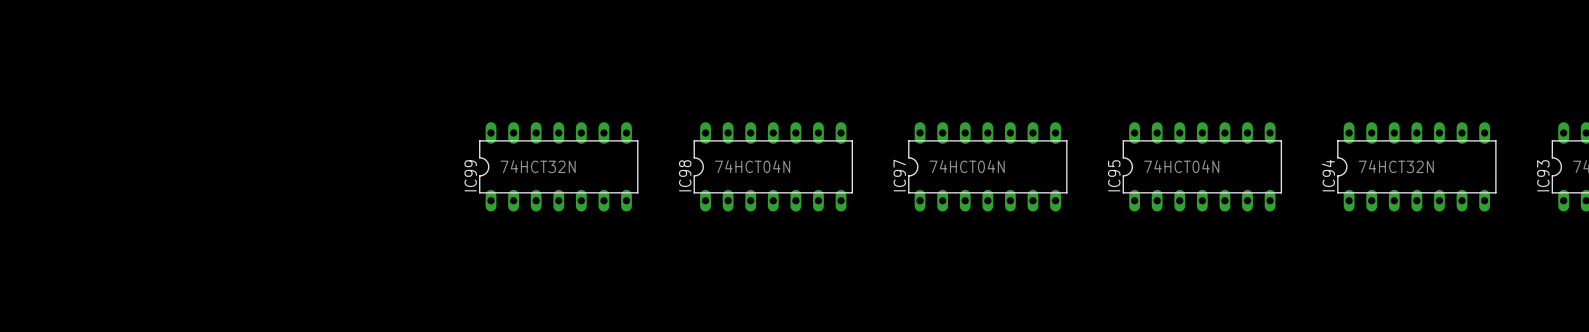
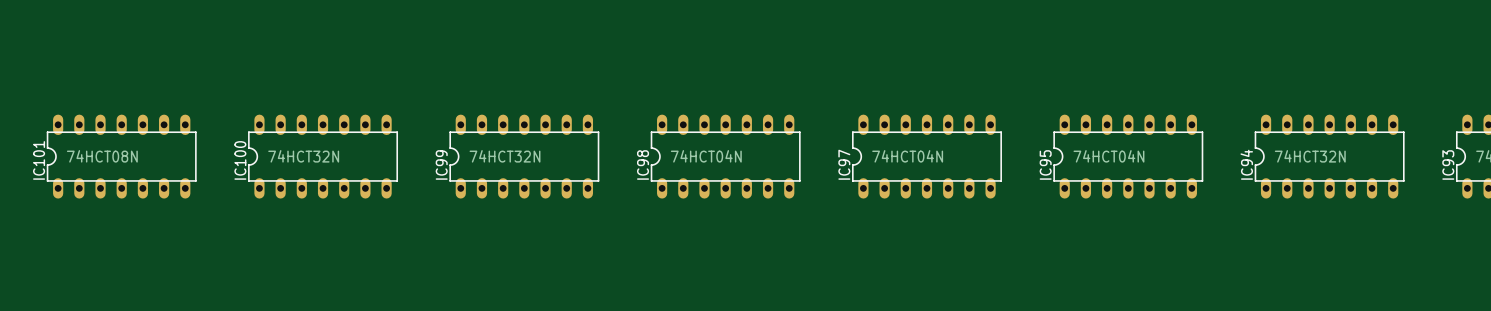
IC101: none -> 74HCT08N (121, 156)
IC100: none -> 74HCT32N (323, 156)

